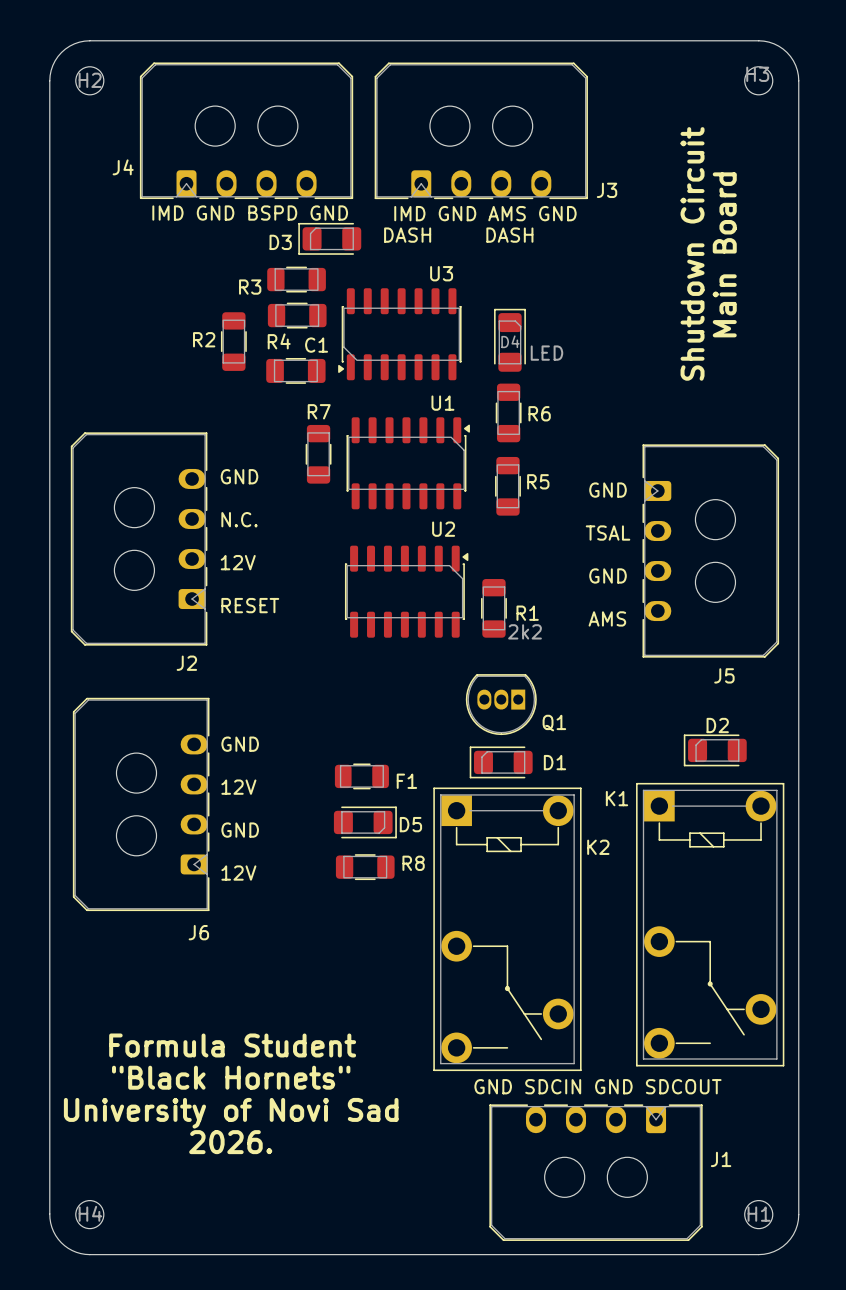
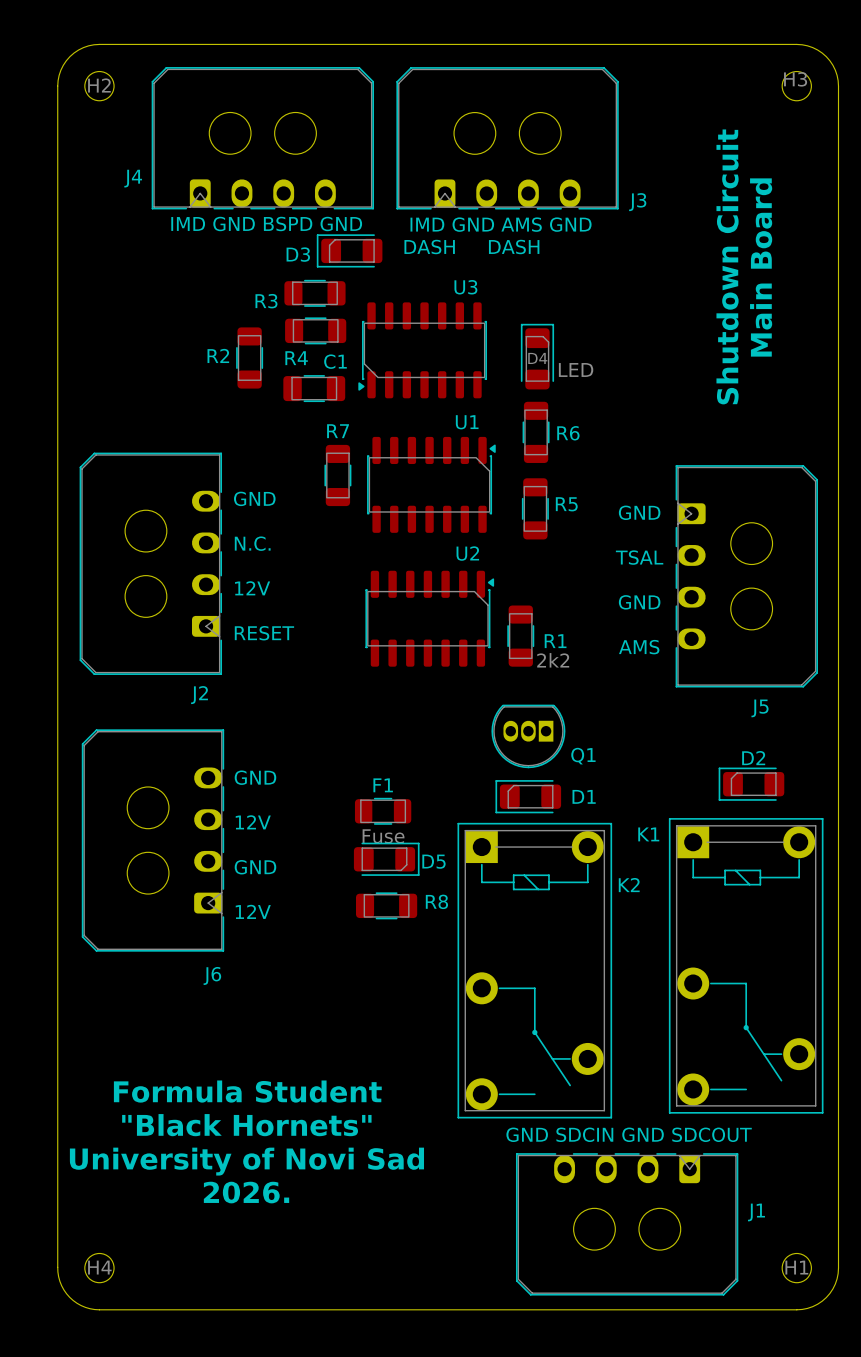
F1 name position: F1 (406, 781) -> F1 (383, 785)
F1 value: none -> Fuse (383, 836)

